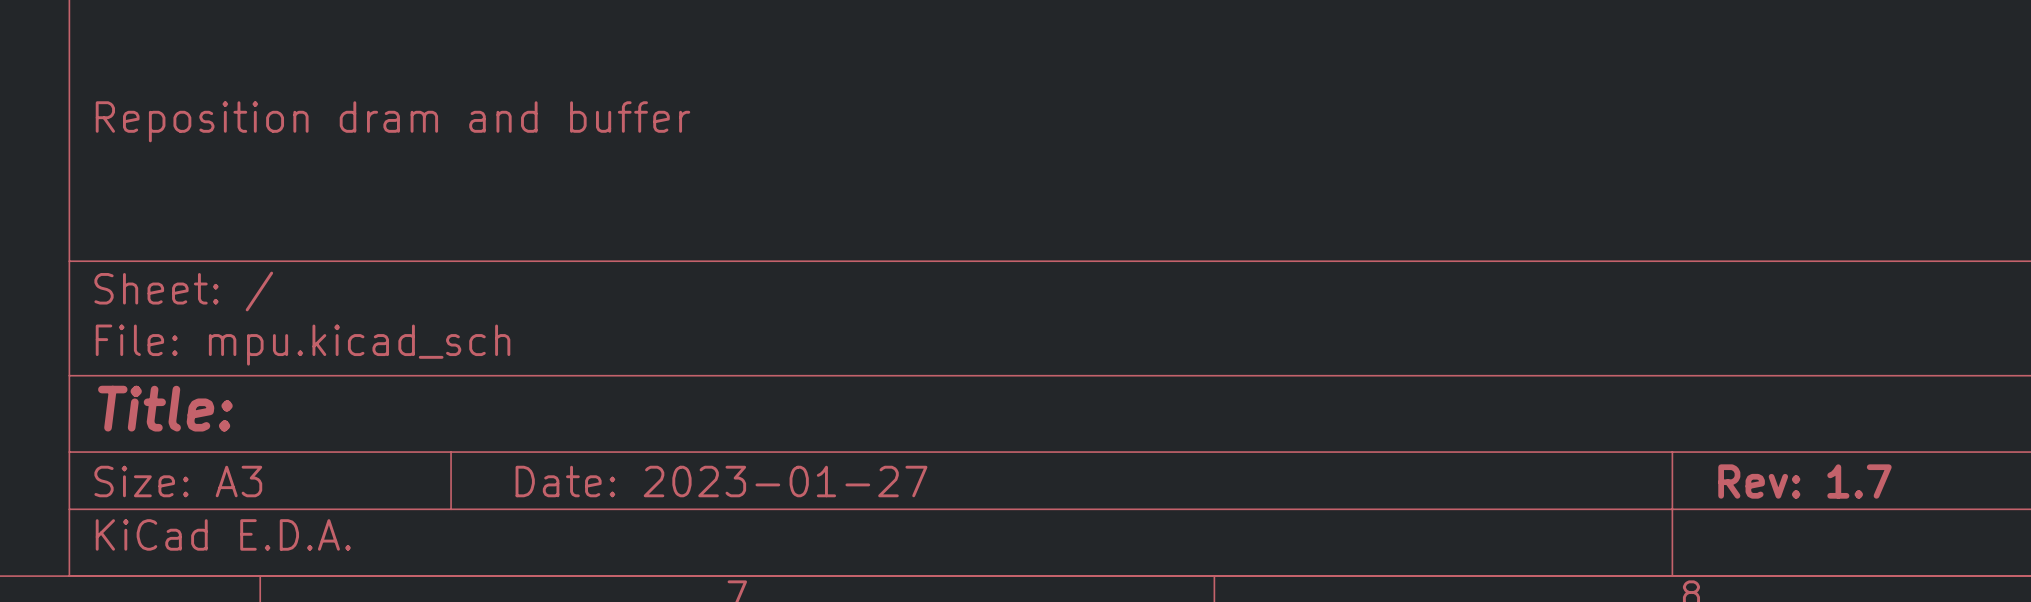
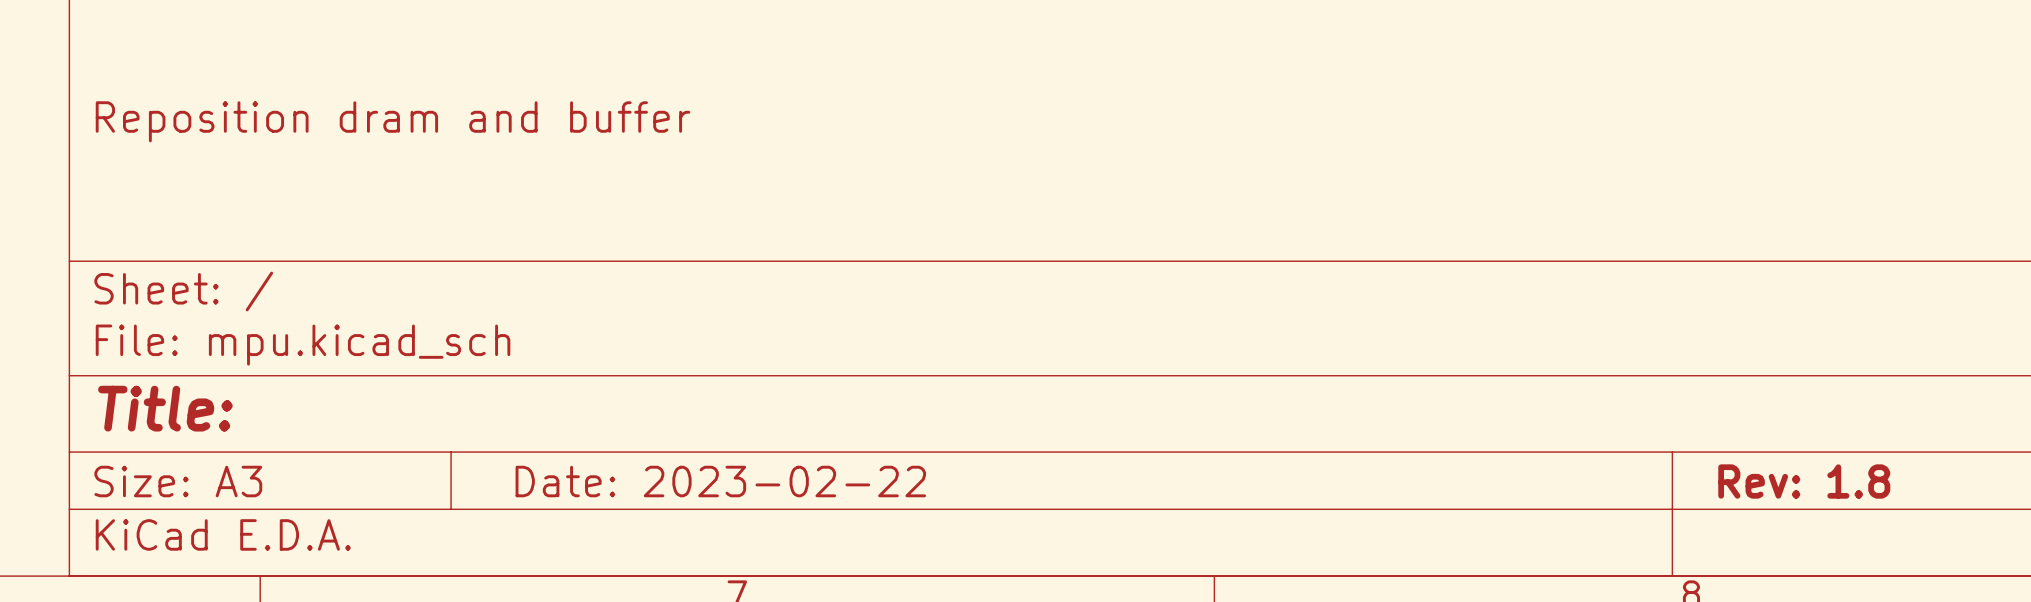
title block: Date: 2023-01-27 (721, 481) -> Date: 2023-02-22 (720, 481)
title block: Rev: 1.7 (1804, 481) -> Rev: 1.8 (1804, 481)

